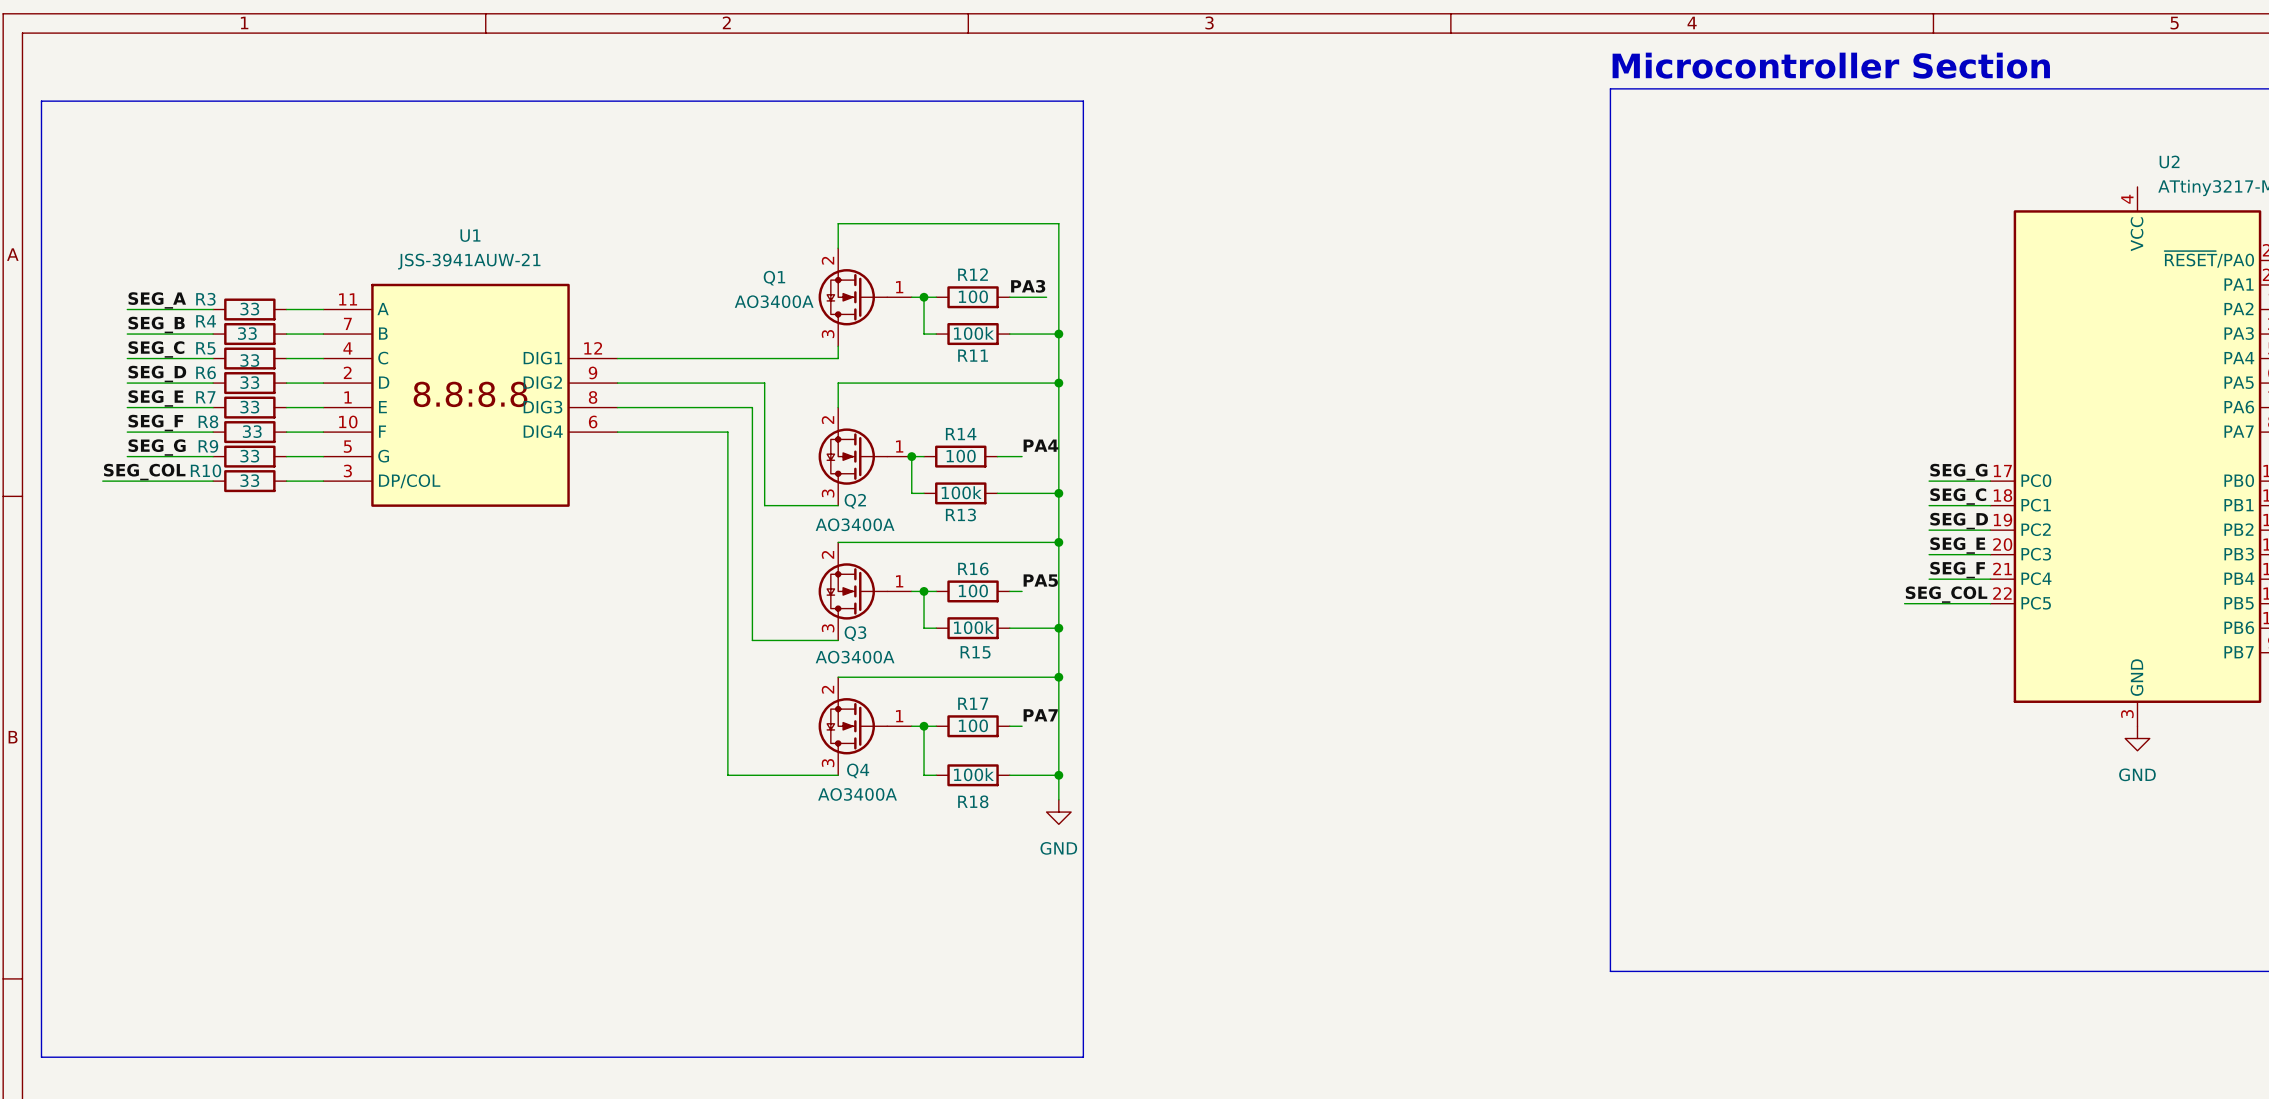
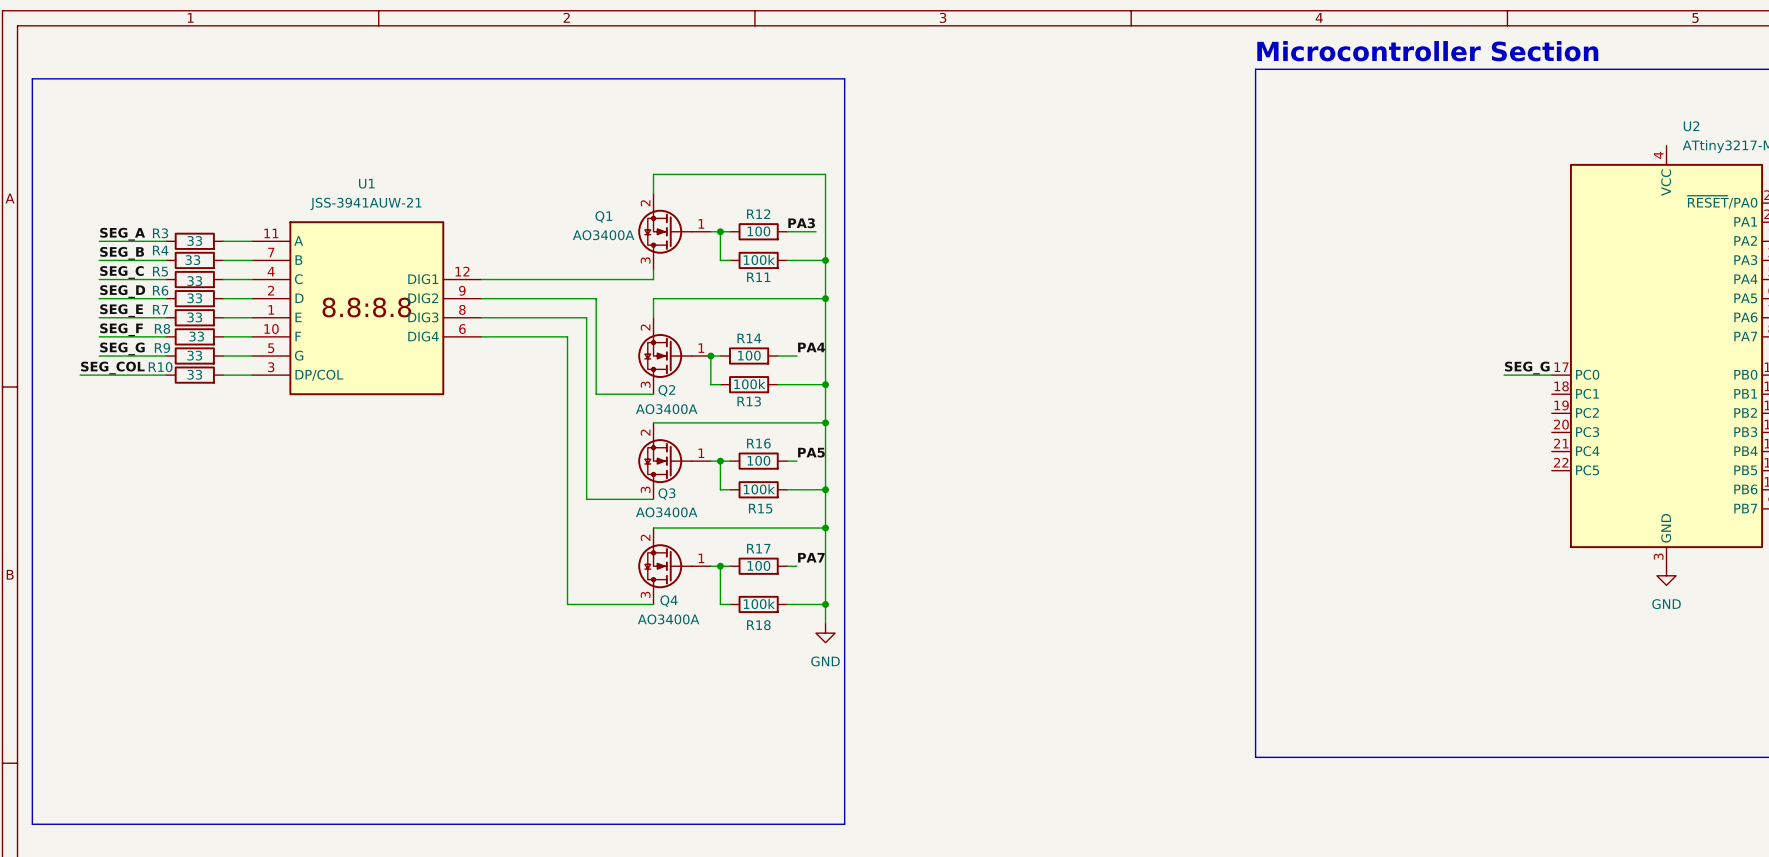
label: SEG_C (1958, 496) -> none
wire: (1929, 505) (1990, 505) -> none
label: SEG_D (1959, 521) -> none
wire: (1929, 530) (1990, 530) -> none
label: SEG_E (1957, 545) -> none
wire: (1929, 554) (1990, 554) -> none
label: SEG_F (1957, 570) -> none
wire: (1929, 579) (1990, 579) -> none
label: SEG_COL (1946, 594) -> none
wire: (1904, 603) (1990, 603) -> none

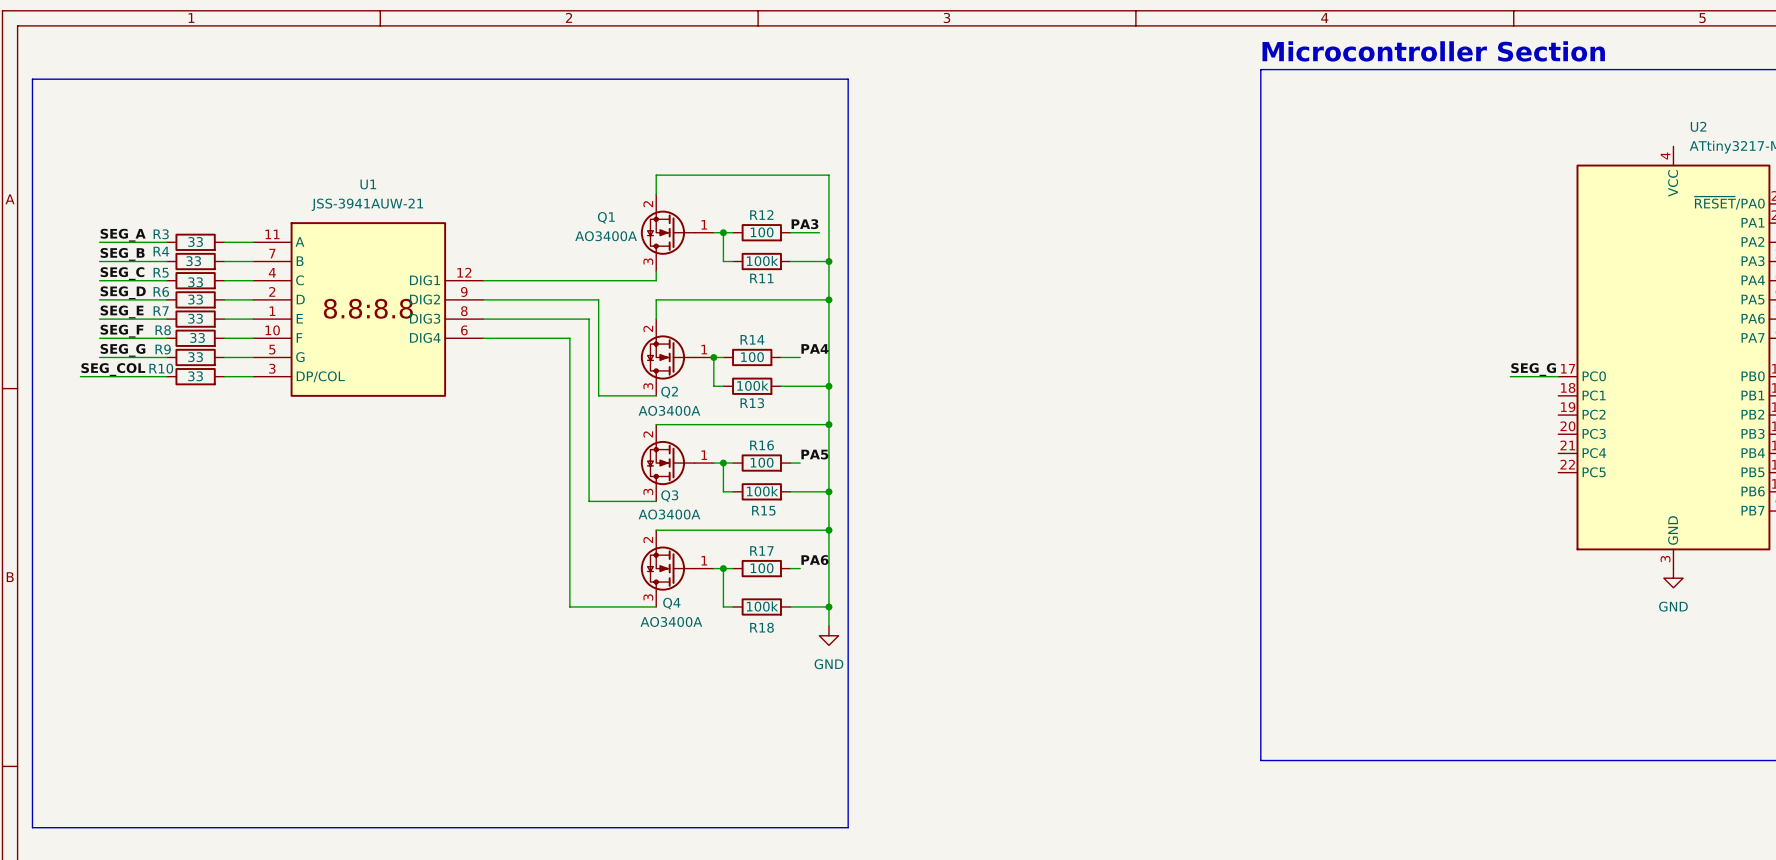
label: PA7 (811, 557) -> PA6 (814, 560)

